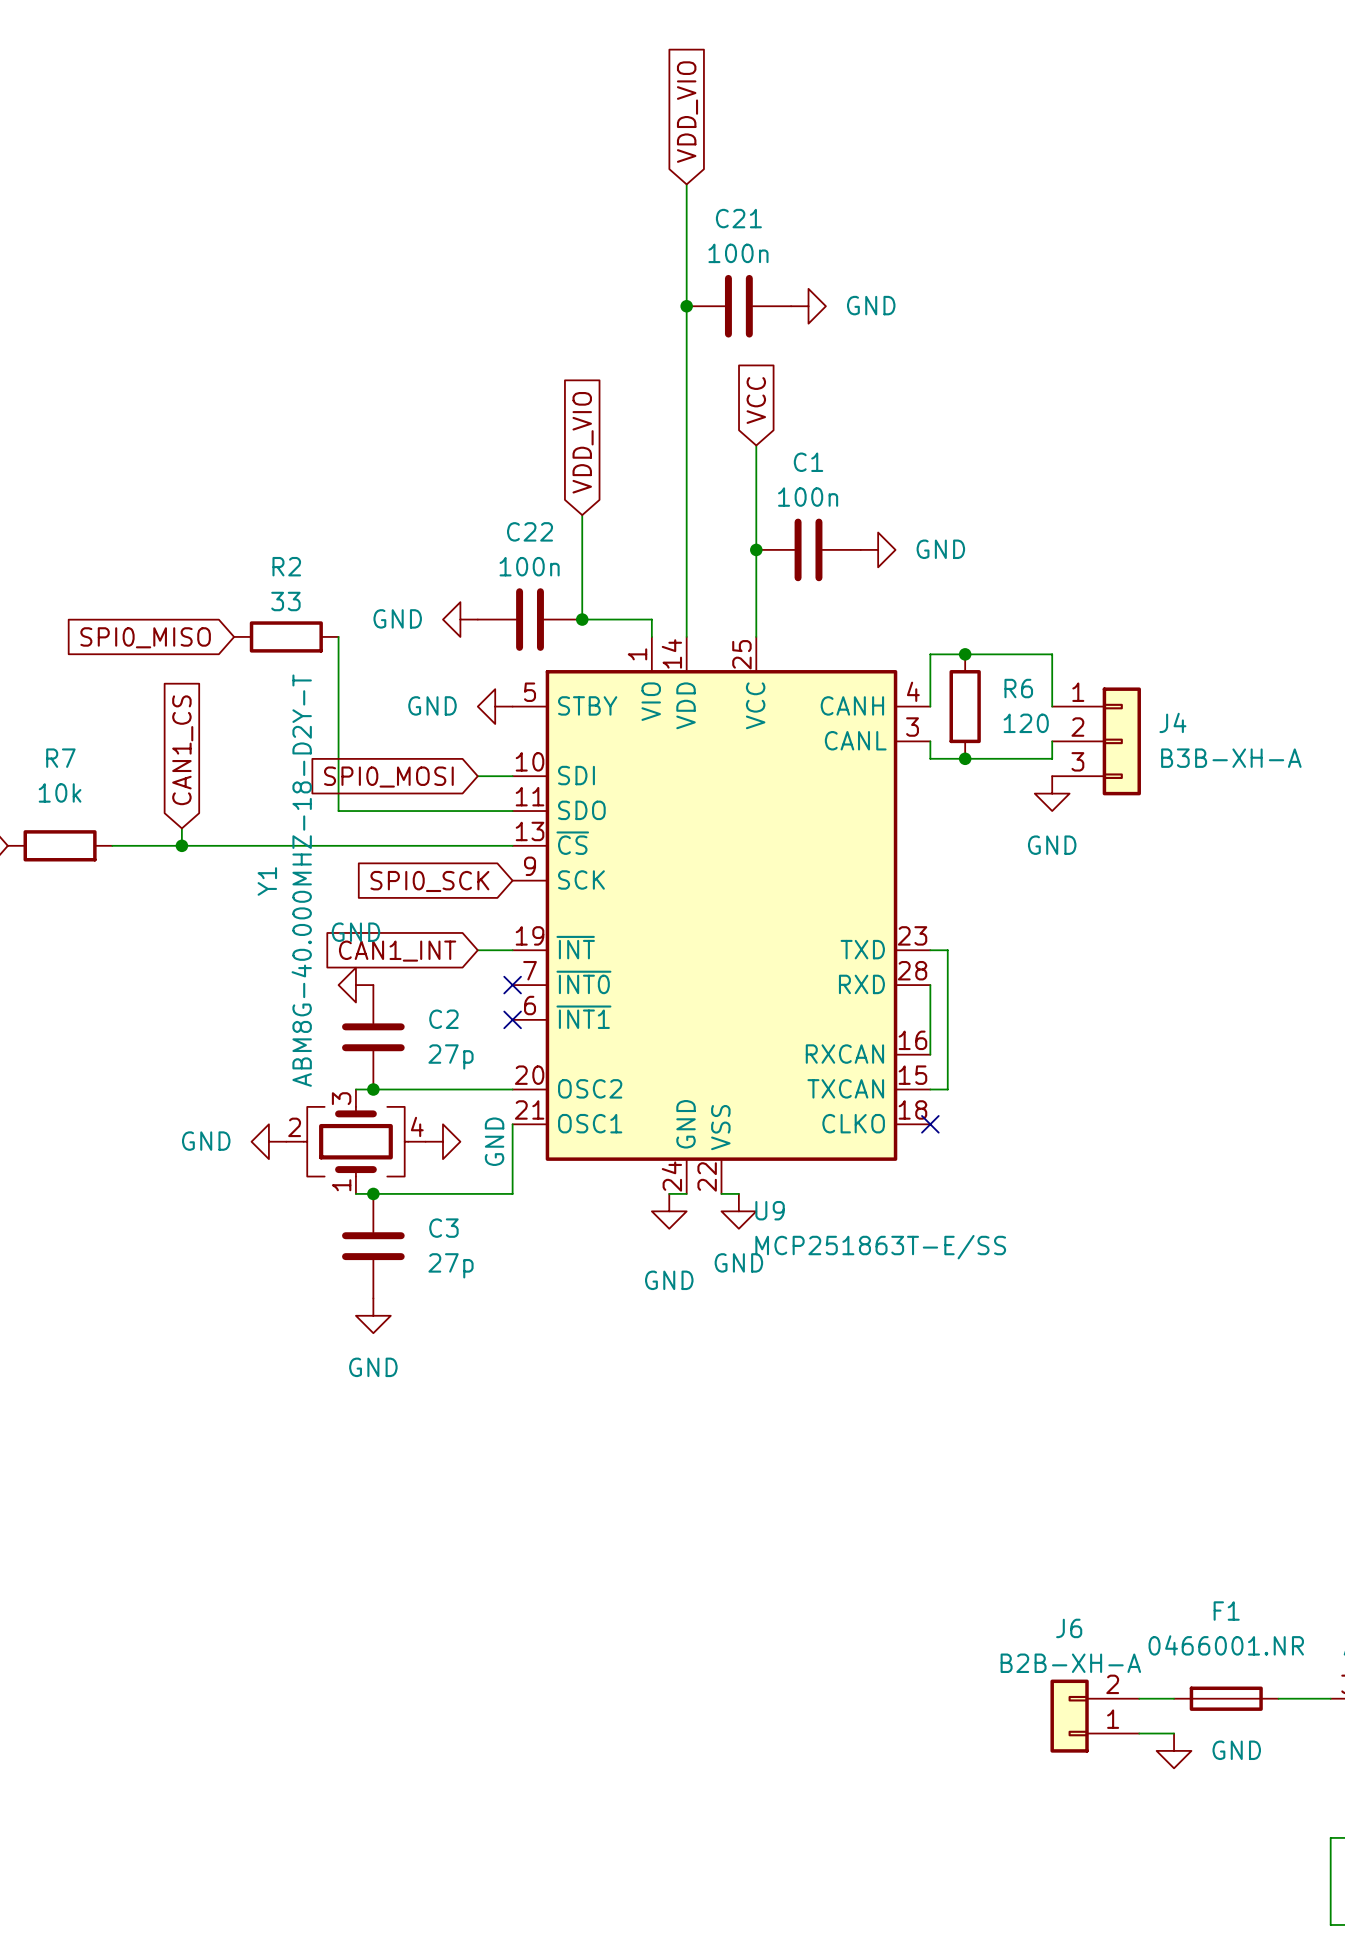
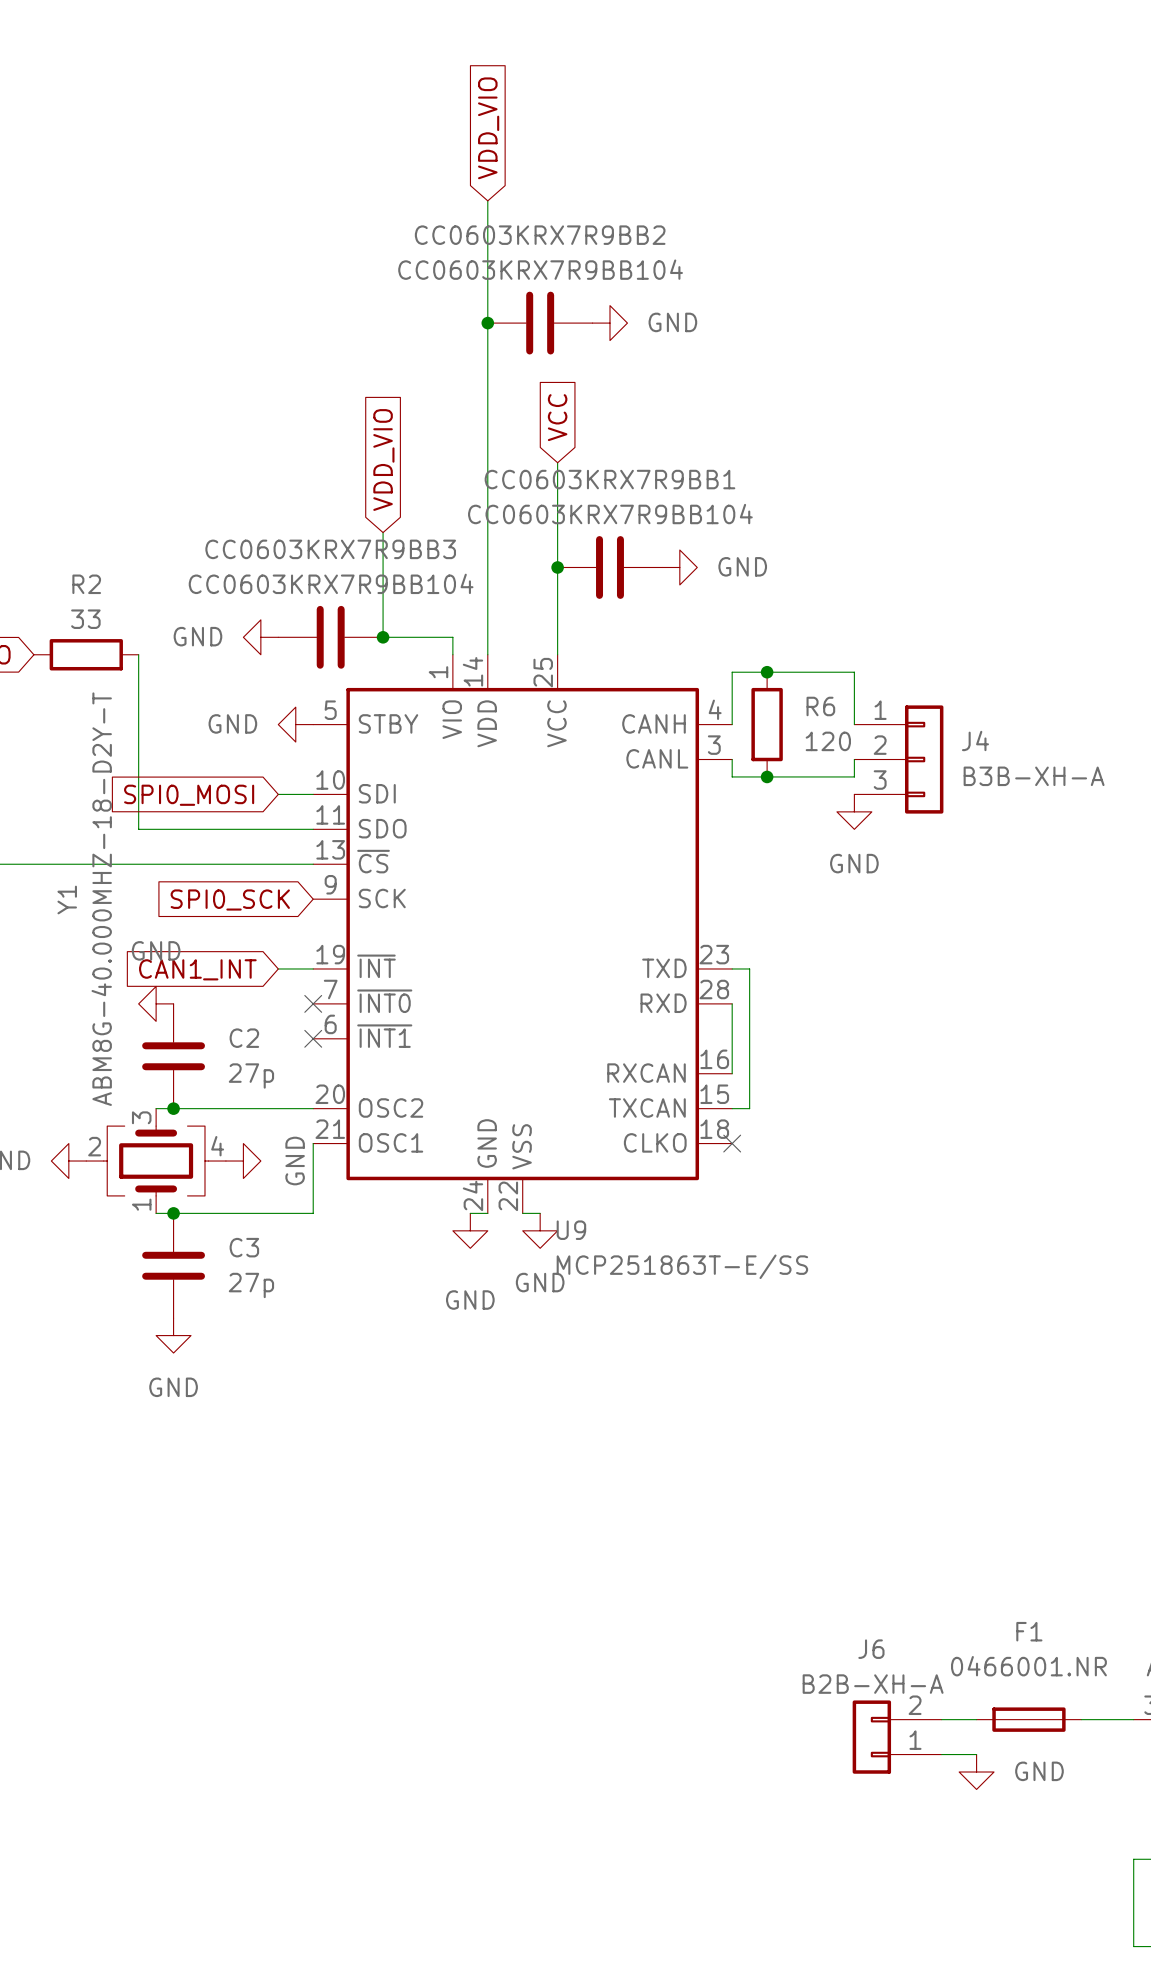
C21 name: C21 (738, 218) -> CC0603KRX7R9BB2 (540, 235)
C21 value: 100n (738, 253) -> CC0603KRX7R9BB104 (540, 269)
C1 name: C1 (808, 462) -> CC0603KRX7R9BB1 (609, 479)
C1 value: 100n (808, 497) -> CC0603KRX7R9BB104 (610, 514)
C22 name: C22 (530, 531) -> CC0603KRX7R9BB3 (330, 549)
C22 value: 100n (529, 566) -> CC0603KRX7R9BB104 (331, 583)

